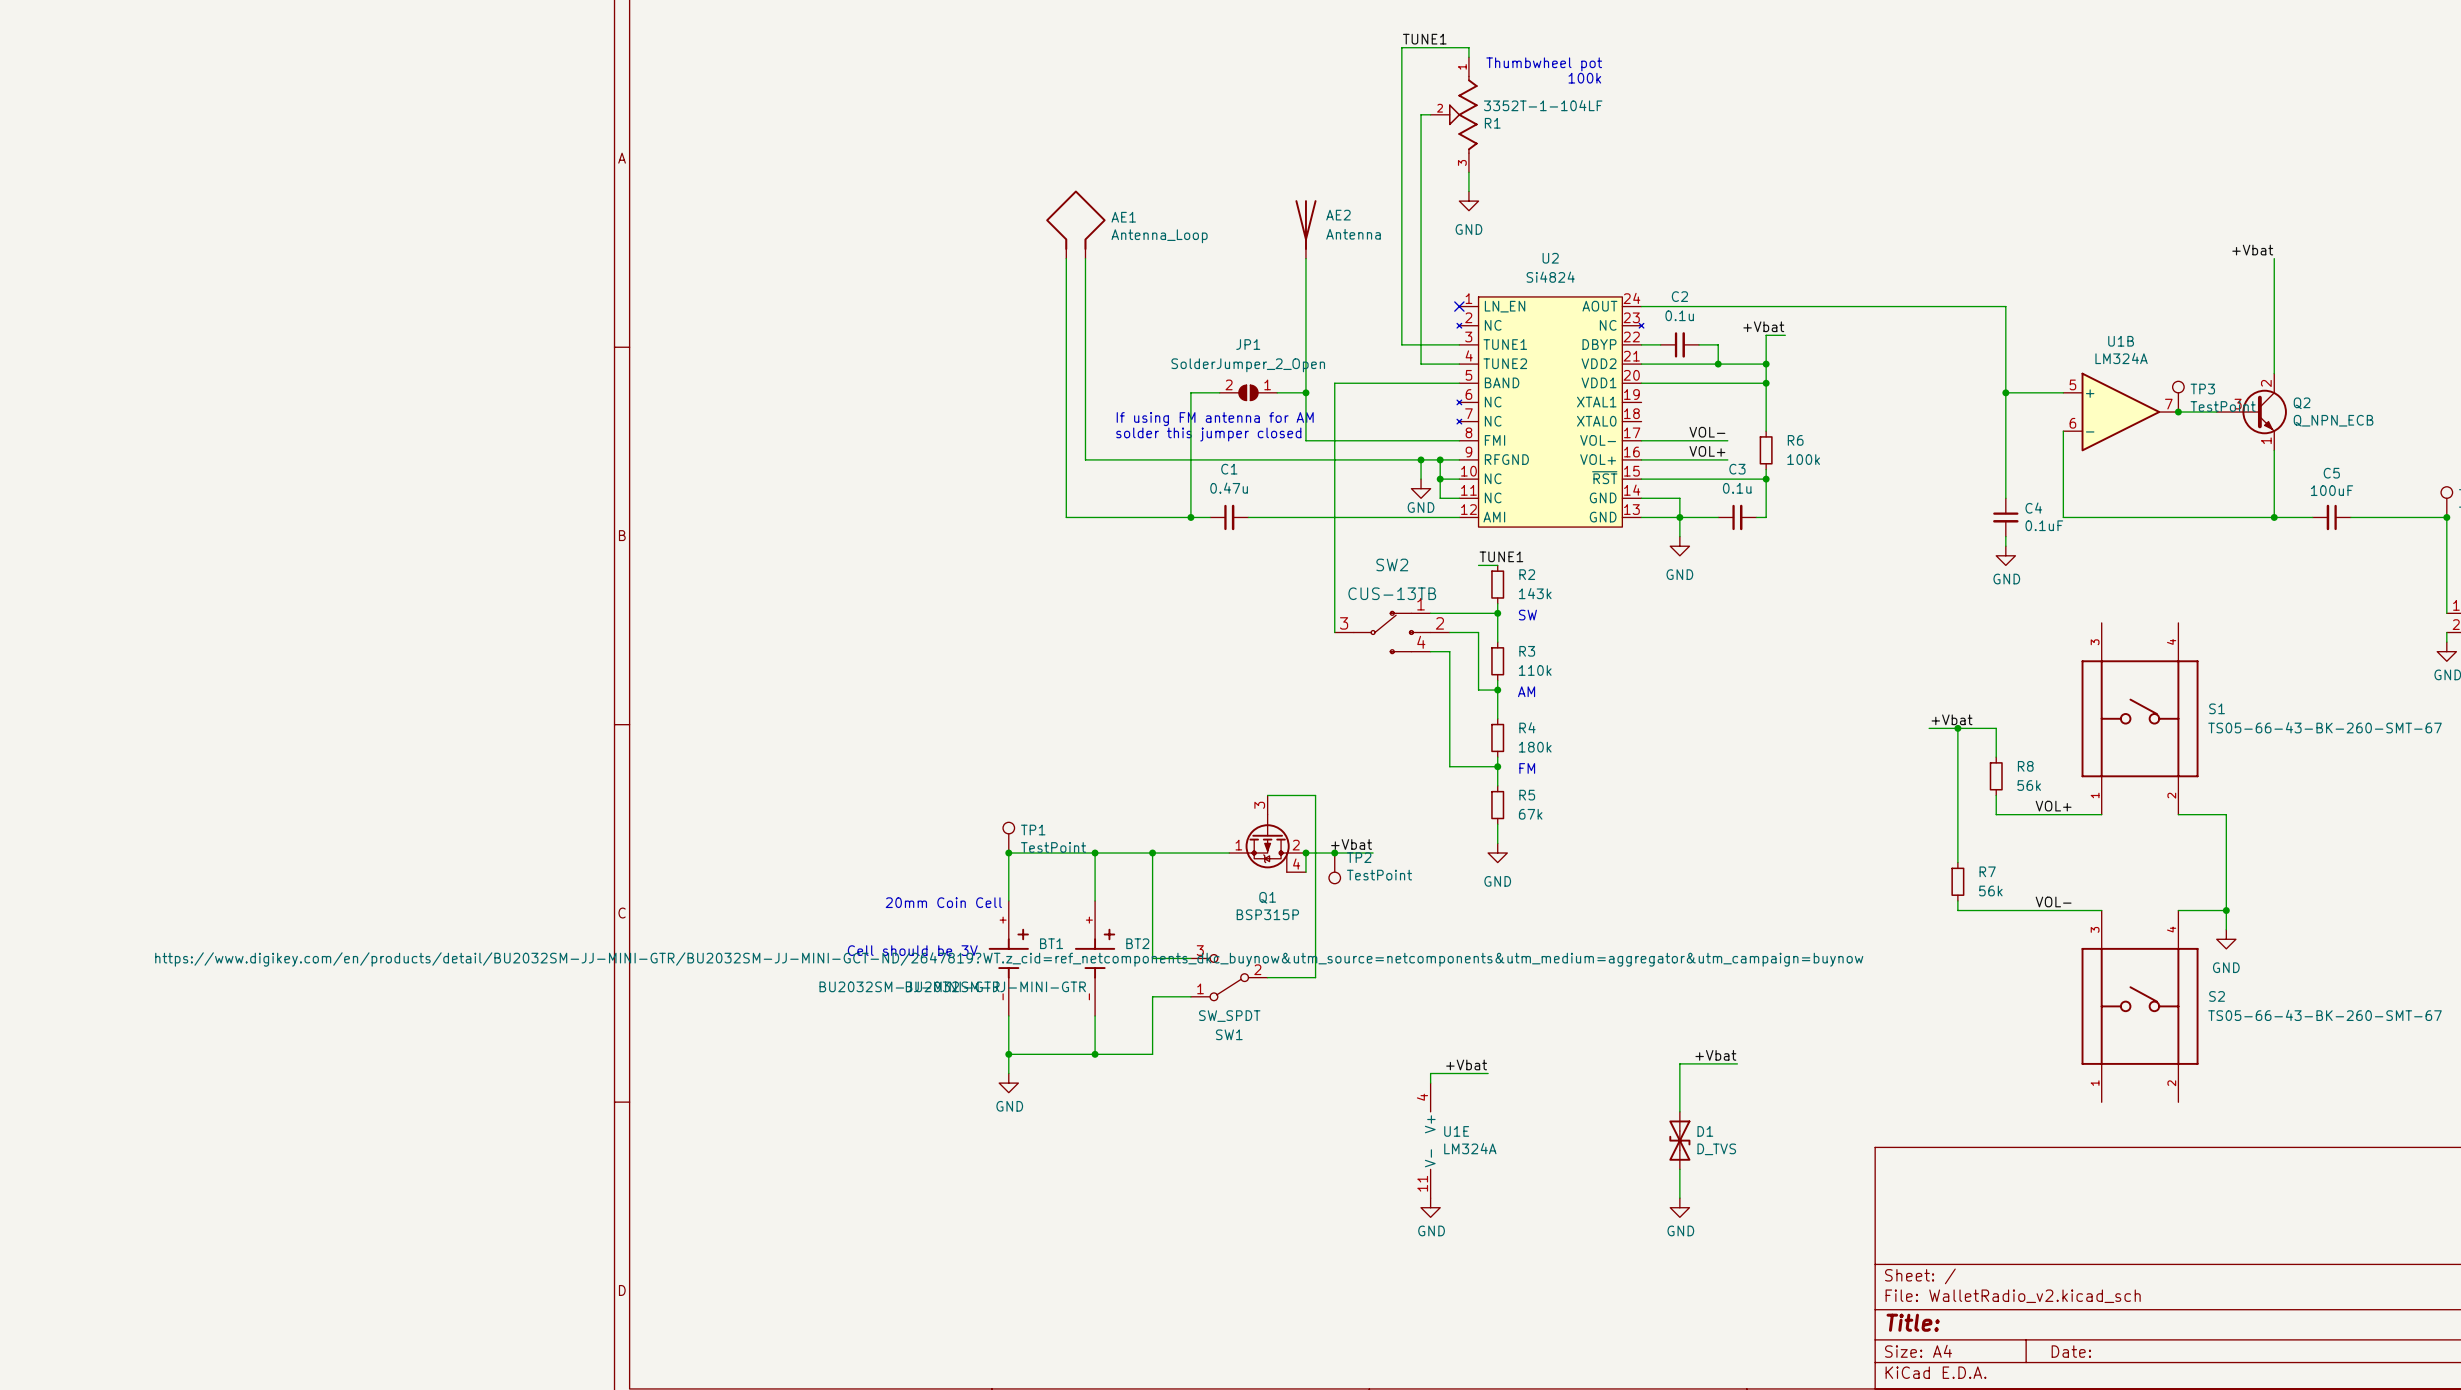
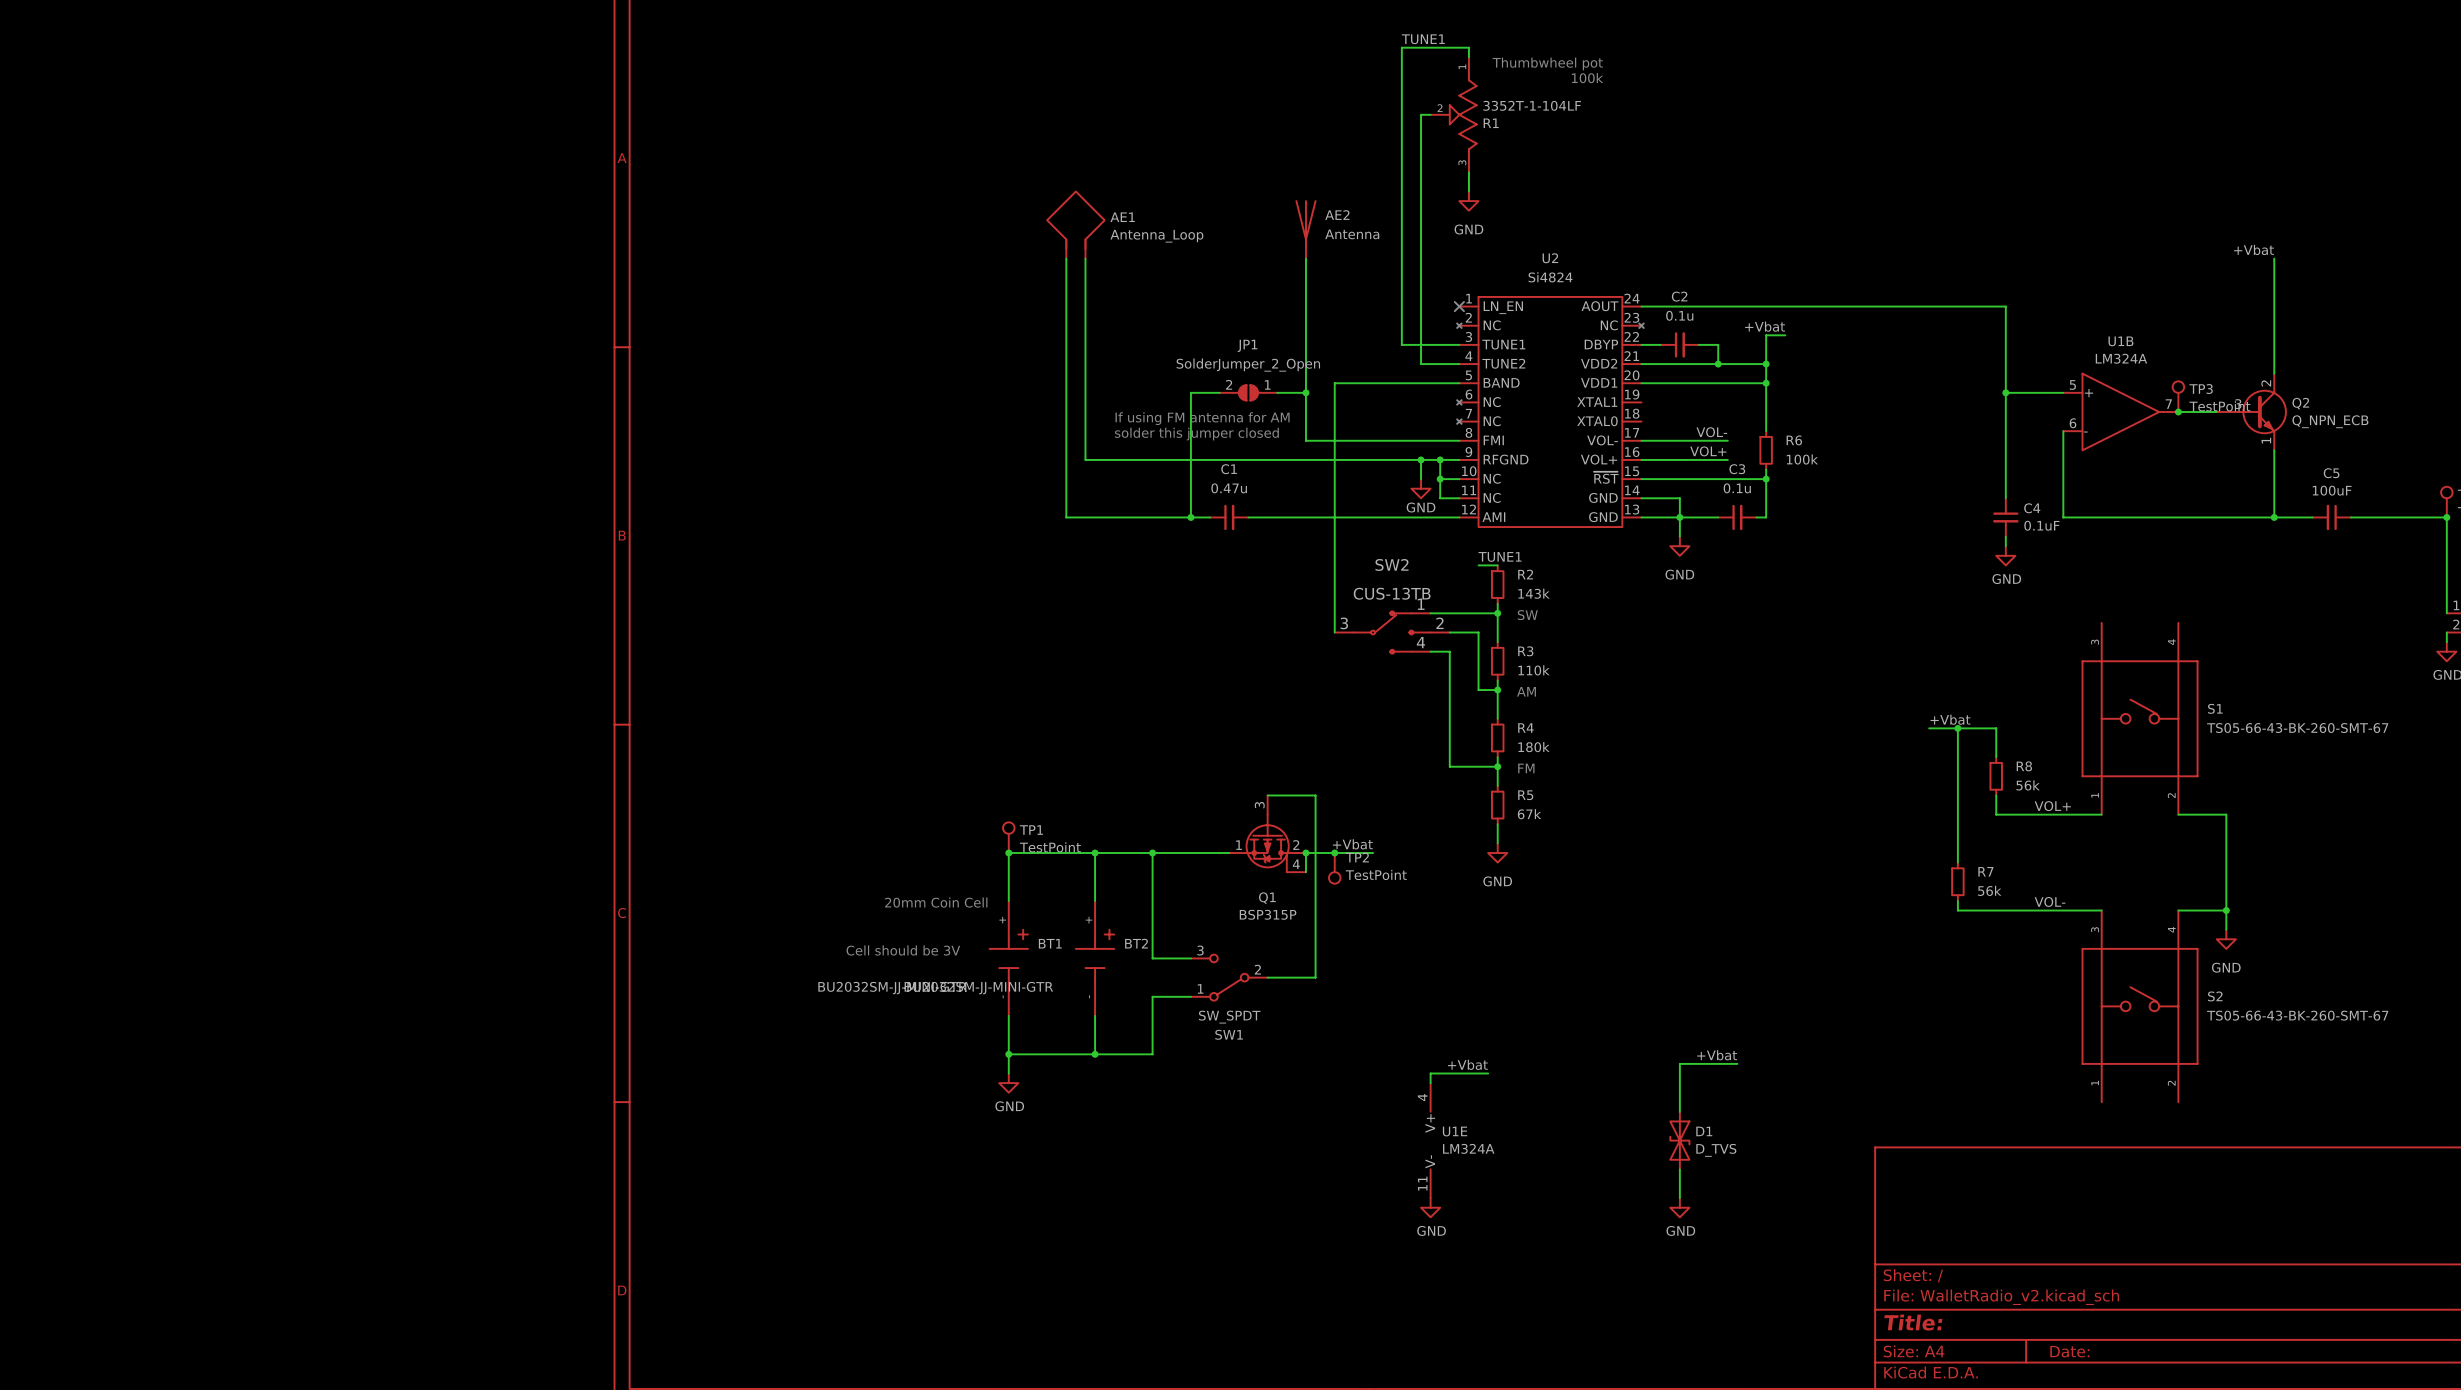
BT1 text: https://www.digikey.com/en/products/detail/BU2032SM-JJ-MINI-GTR/BU2032SM-JJ-MINI-GCT-ND/2647819?WT.z_cid=ref_netcomponents_dkc_buynow&utm_source=netcomponents&utm_medium=aggregator&utm_campaign=buynow (1009, 959) -> none

